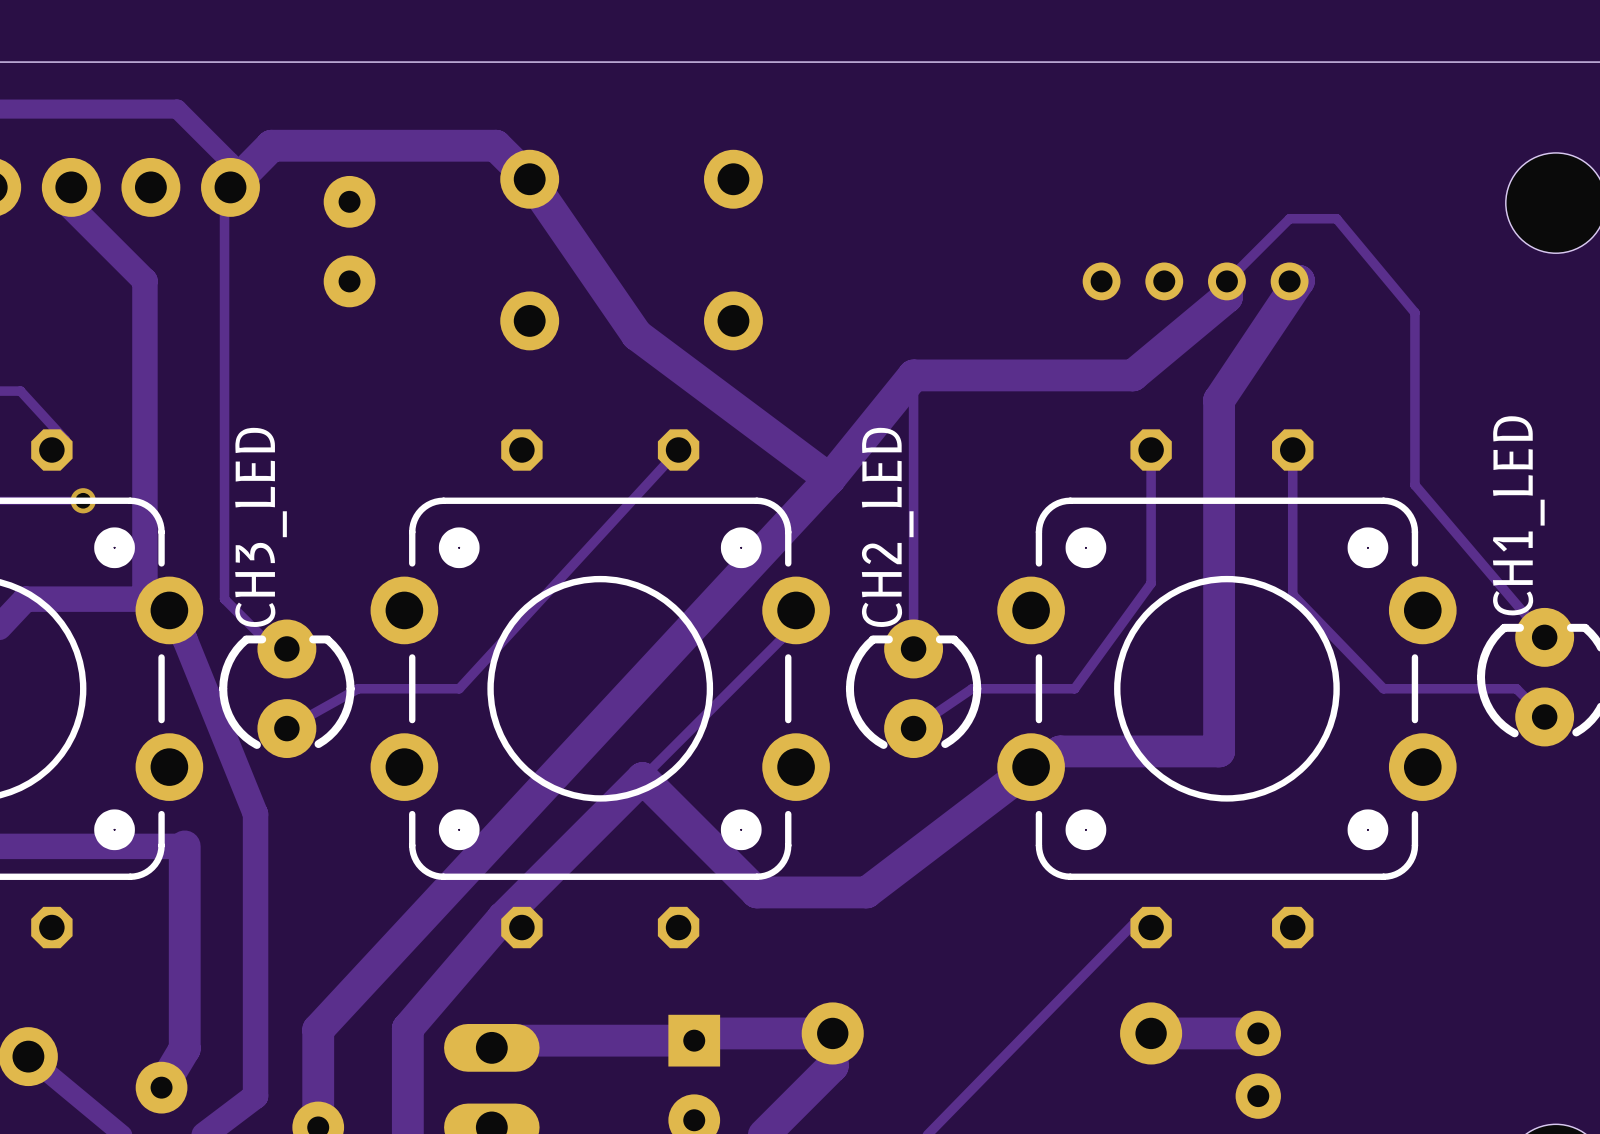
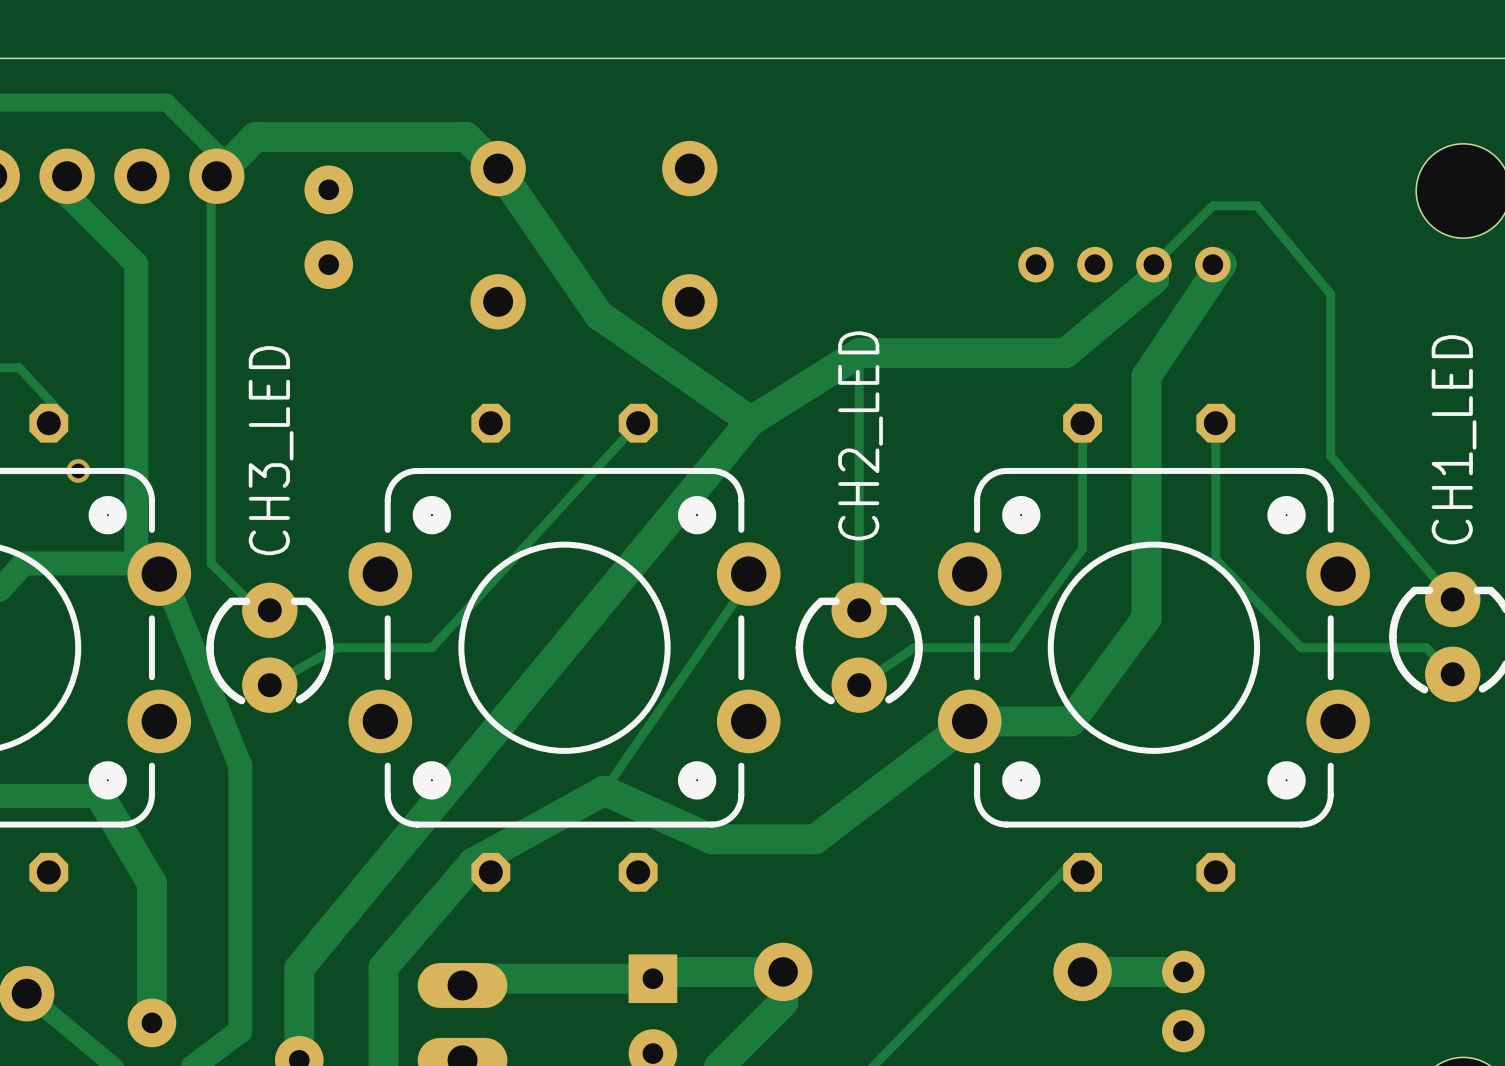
track: (636, 335) (829, 479) -> (598, 315) (750, 421)
track: (913, 375) (829, 479) -> (859, 353) (750, 421)
track: (829, 479) (318, 1029) -> (750, 421) (299, 968)
CH1_LED name position: CH1_LED (1518, 515) -> CH1_LED (1454, 439)
CH3_LED name position: CH3_LED (261, 527) -> CH3_LED (271, 450)
CH2_LED name position: CH2_LED (887, 527) -> CH2_LED (860, 435)
track: (781, 638) (642, 778) -> (735, 600) (604, 790)
track: (1219, 657) (1219, 751) (1060, 751) (1031, 767) -> (1146, 618) (1070, 721) (969, 721)
track: (642, 778) (503, 917) -> (604, 790) (473, 862)
track: (642, 778) (756, 892) -> (604, 790) (711, 839)
track: (106, 846) (184, 846) (184, 1048) (161, 1087) -> (100, 796) (151, 883) (151, 1022)

